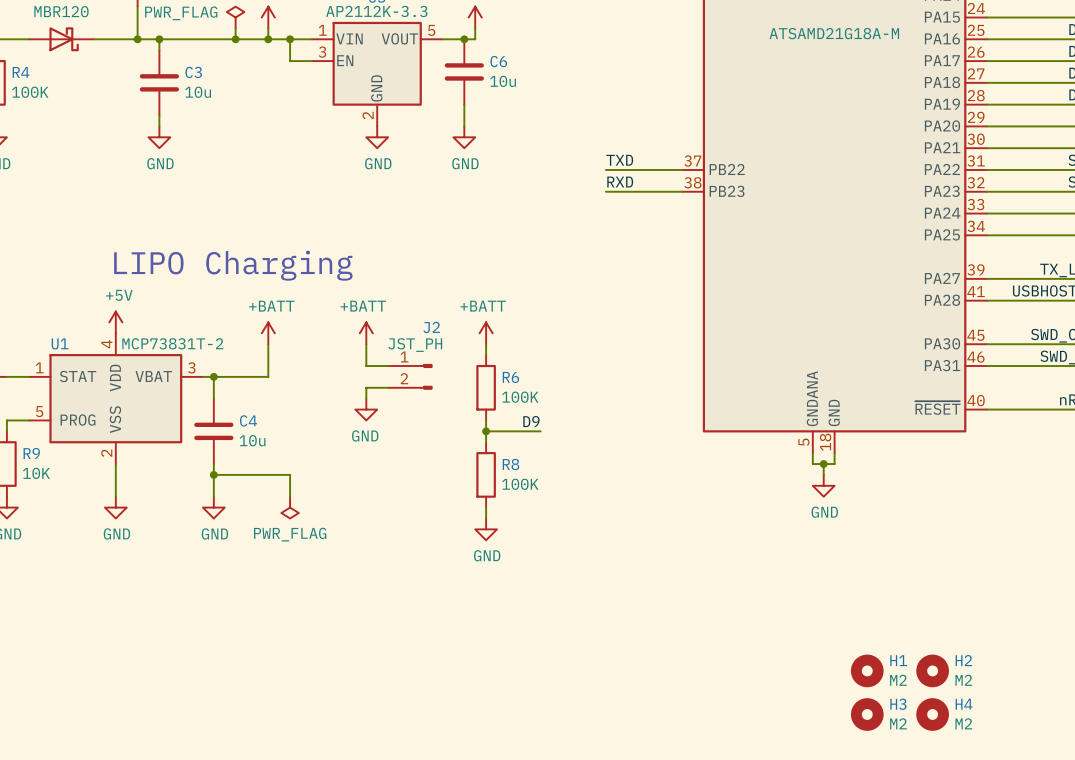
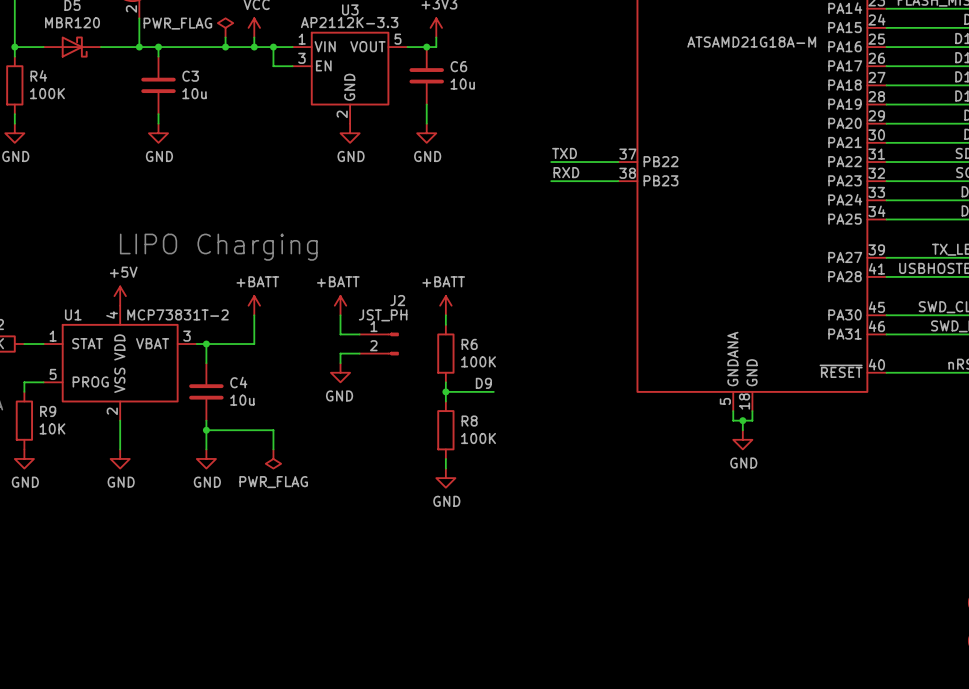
H1: M2 (867, 670) -> none
H2: M2 (932, 670) -> none
H3: M2 (867, 714) -> none
H4: M2 (932, 714) -> none

